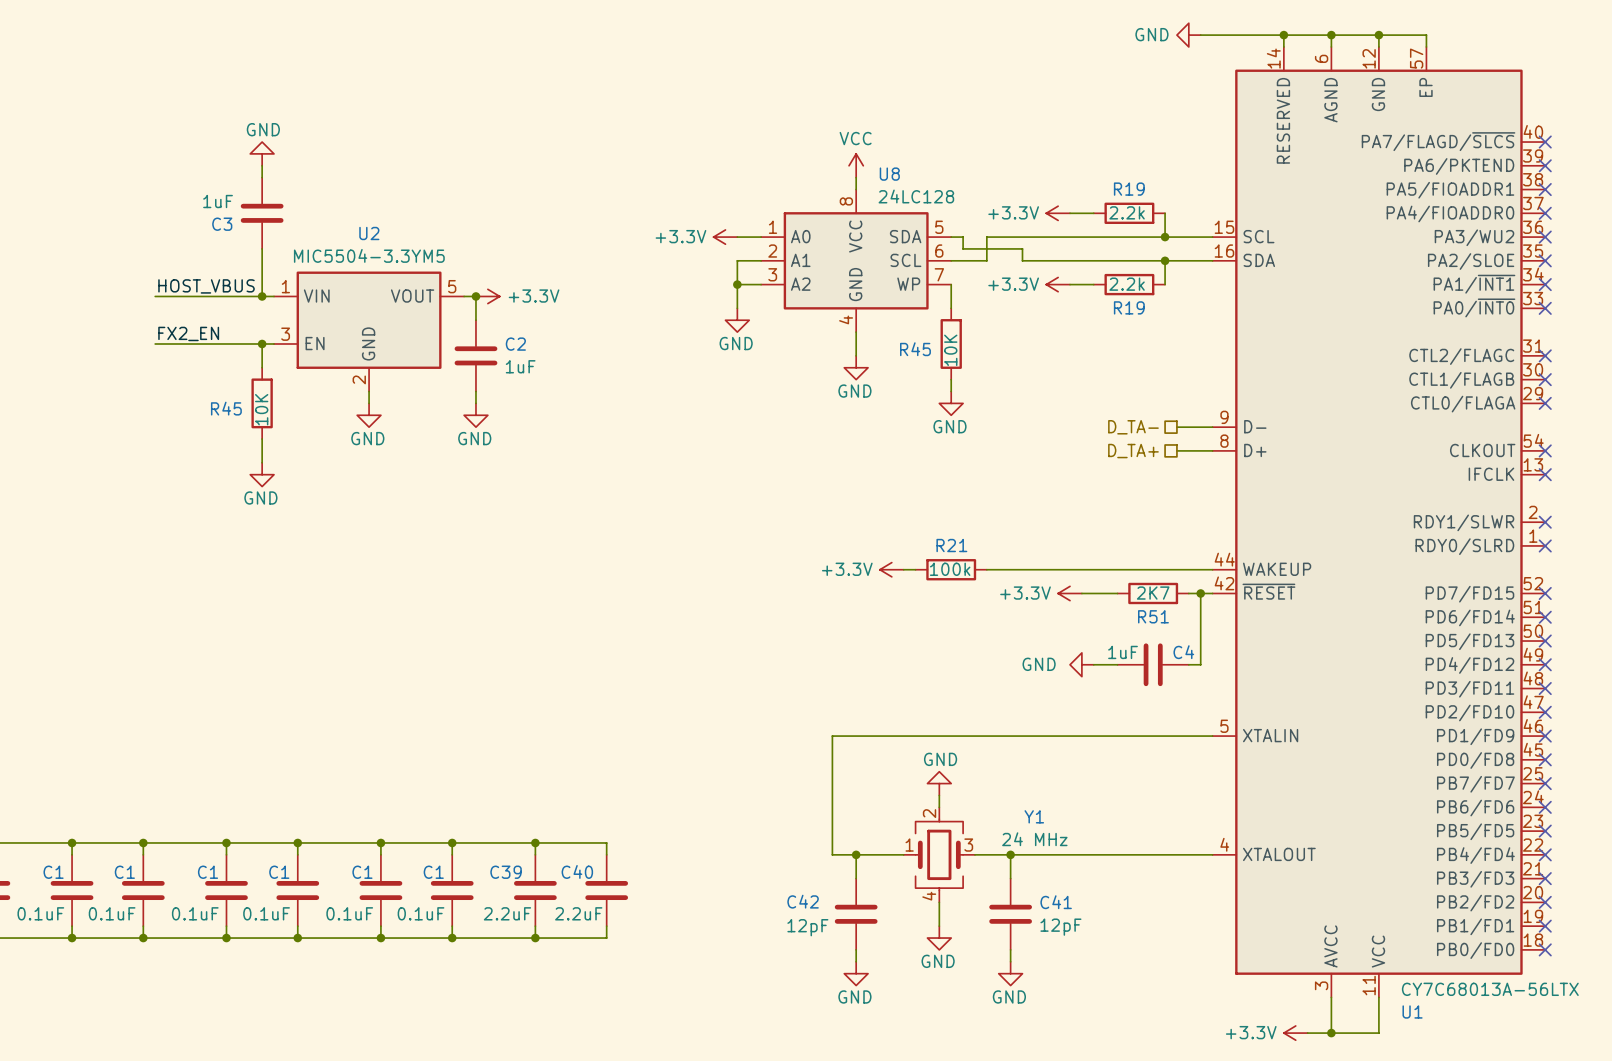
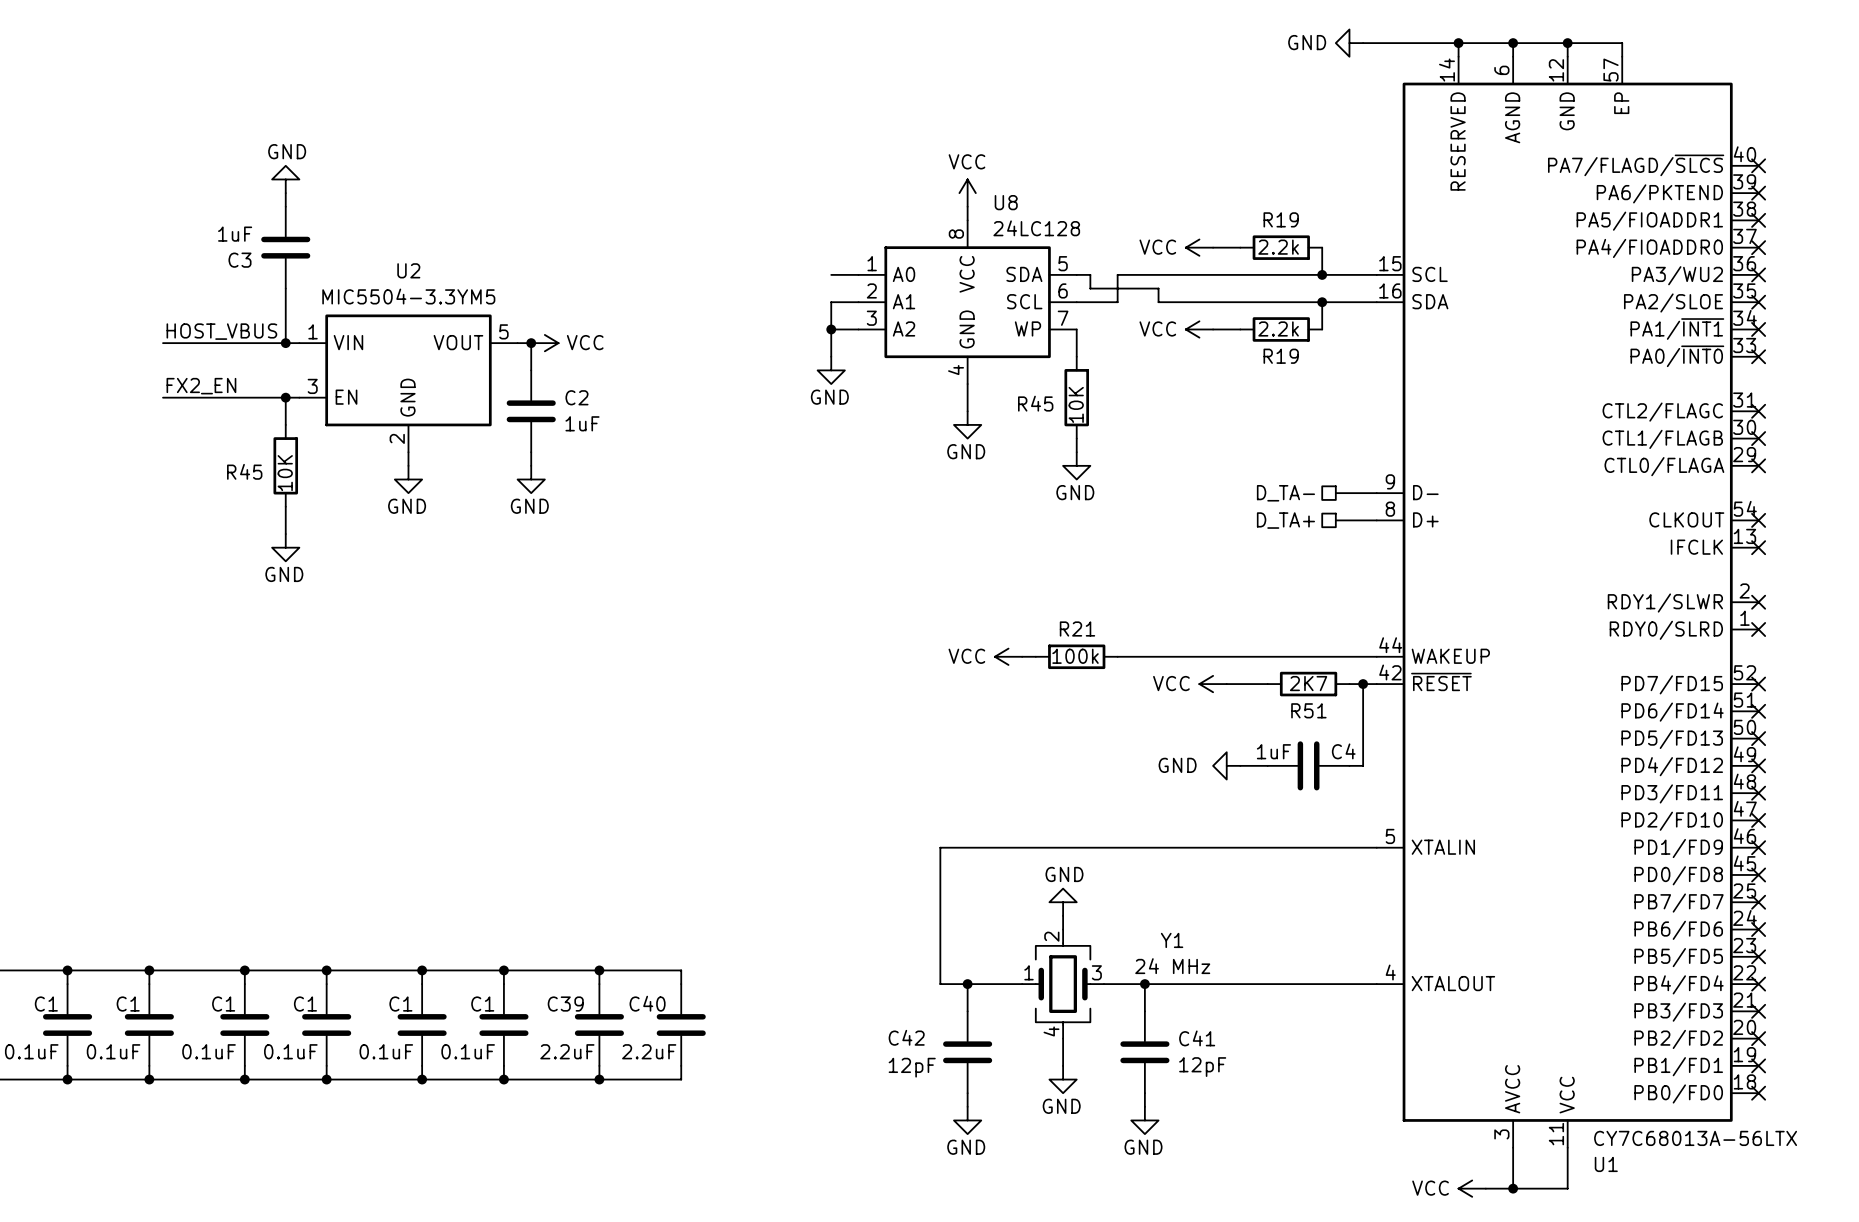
power symbol: +3.3V (1058, 213) -> VCC (1199, 247)
power symbol: +3.3V (725, 237) -> none
power symbol: +3.3V (1058, 284) -> VCC (1199, 329)
power symbol: +3.3V (487, 296) -> VCC (544, 343)
power symbol: +3.3V (891, 569) -> VCC (1008, 656)
power symbol: +3.3V (1070, 593) -> VCC (1213, 684)
power symbol: +3.3V (1295, 1033) -> VCC (1472, 1188)

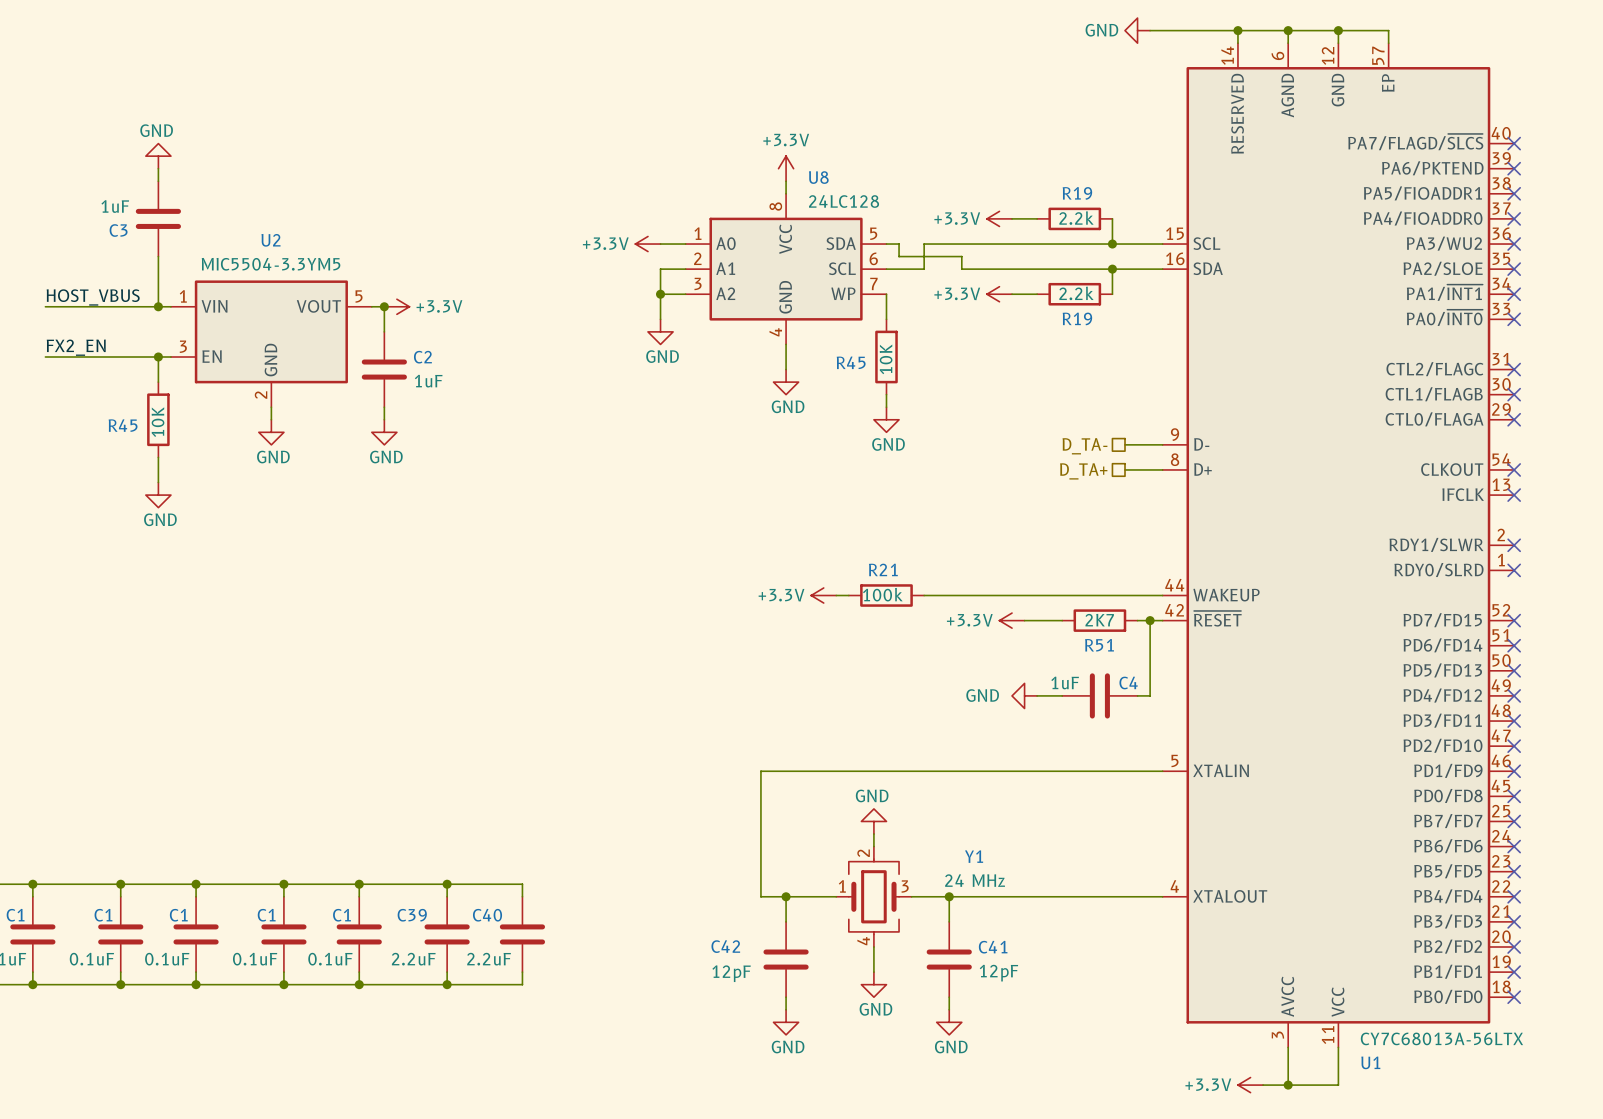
power symbol: VCC (967, 193) -> +3.3V (786, 168)
power symbol: VCC (1199, 247) -> +3.3V (999, 218)
power symbol: none -> +3.3V (647, 244)
power symbol: VCC (1199, 329) -> +3.3V (999, 294)
power symbol: VCC (544, 343) -> +3.3V (396, 306)
power symbol: VCC (1008, 656) -> +3.3V (823, 595)
power symbol: VCC (1213, 684) -> +3.3V (1012, 620)
power symbol: VCC (1472, 1188) -> +3.3V (1250, 1085)

